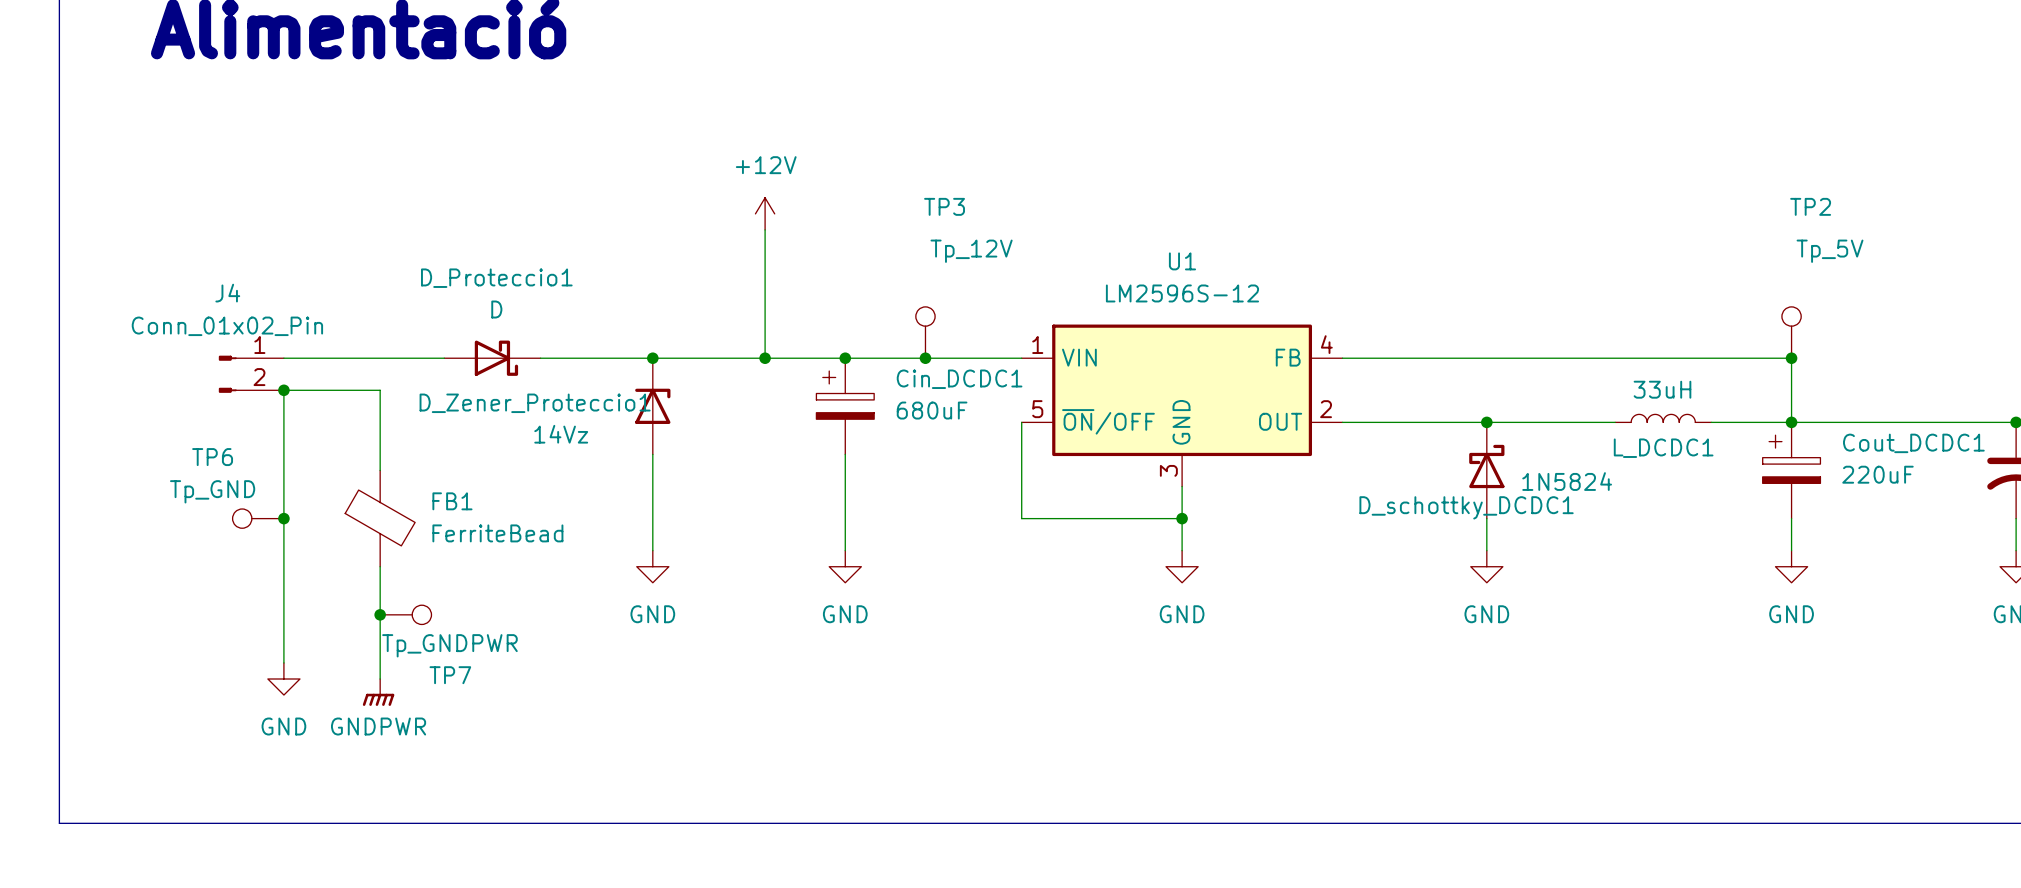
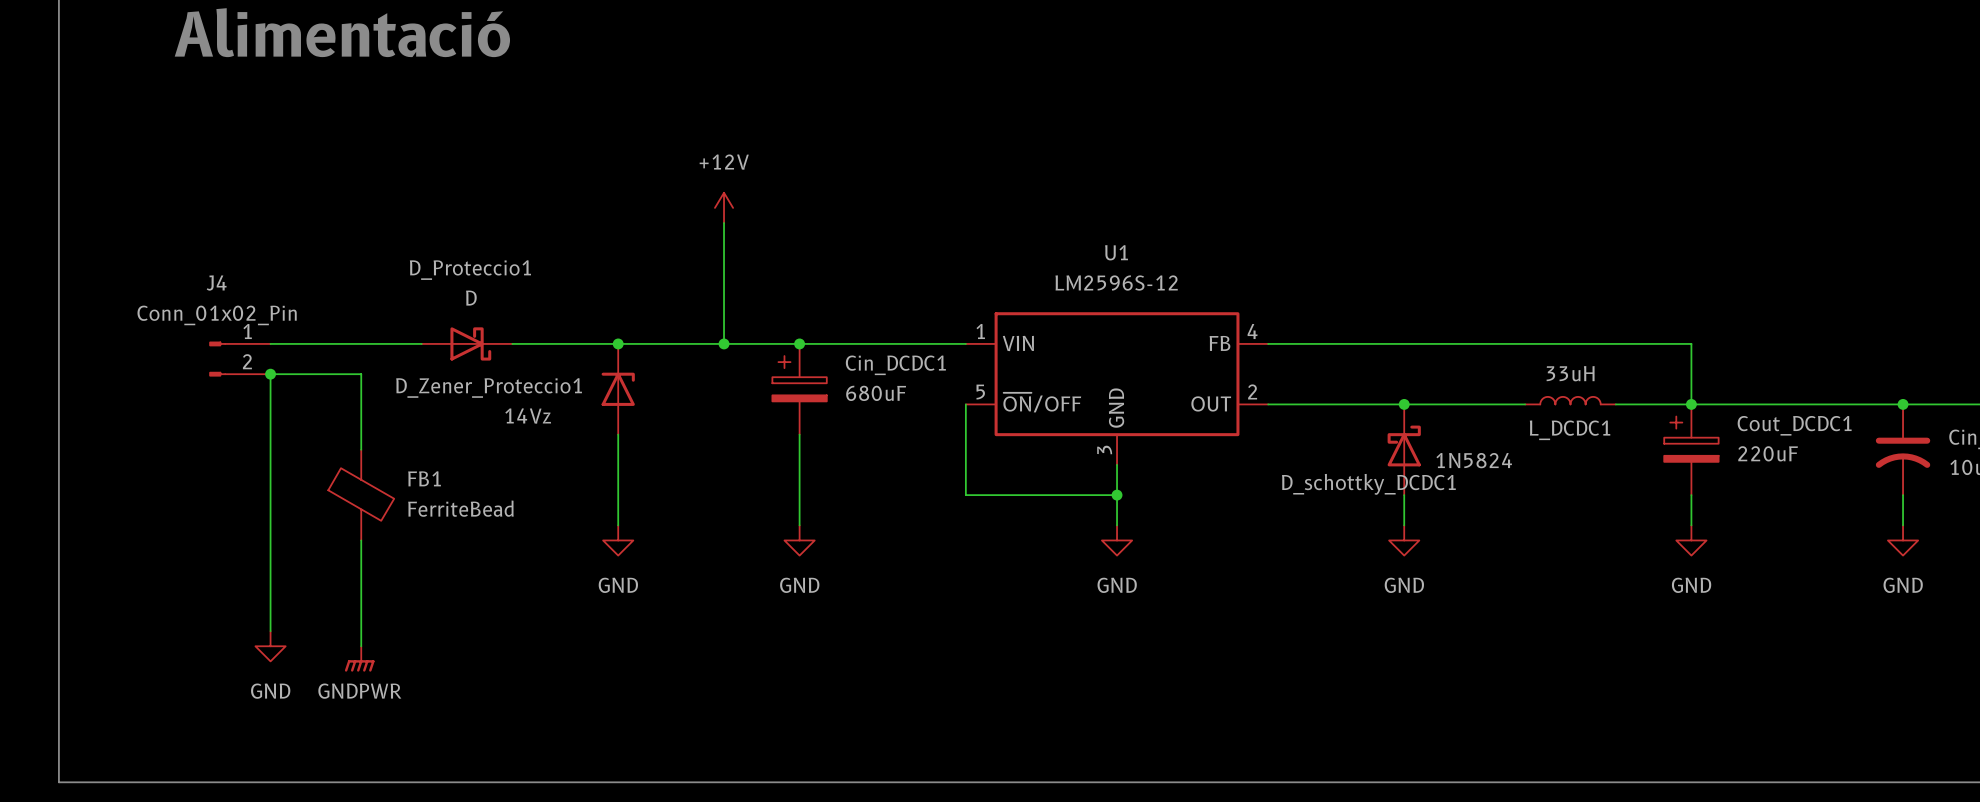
TP3: Tp_12V (925, 332) -> none
TP2: Tp_5V (1791, 332) -> none
junction: (925, 358) -> none
junction: (1791, 358) -> none
TP6: Tp_GND (258, 518) -> none
junction: (283, 518) -> none
junction: (380, 614) -> none
TP7: Tp_GNDPWR (405, 614) -> none

